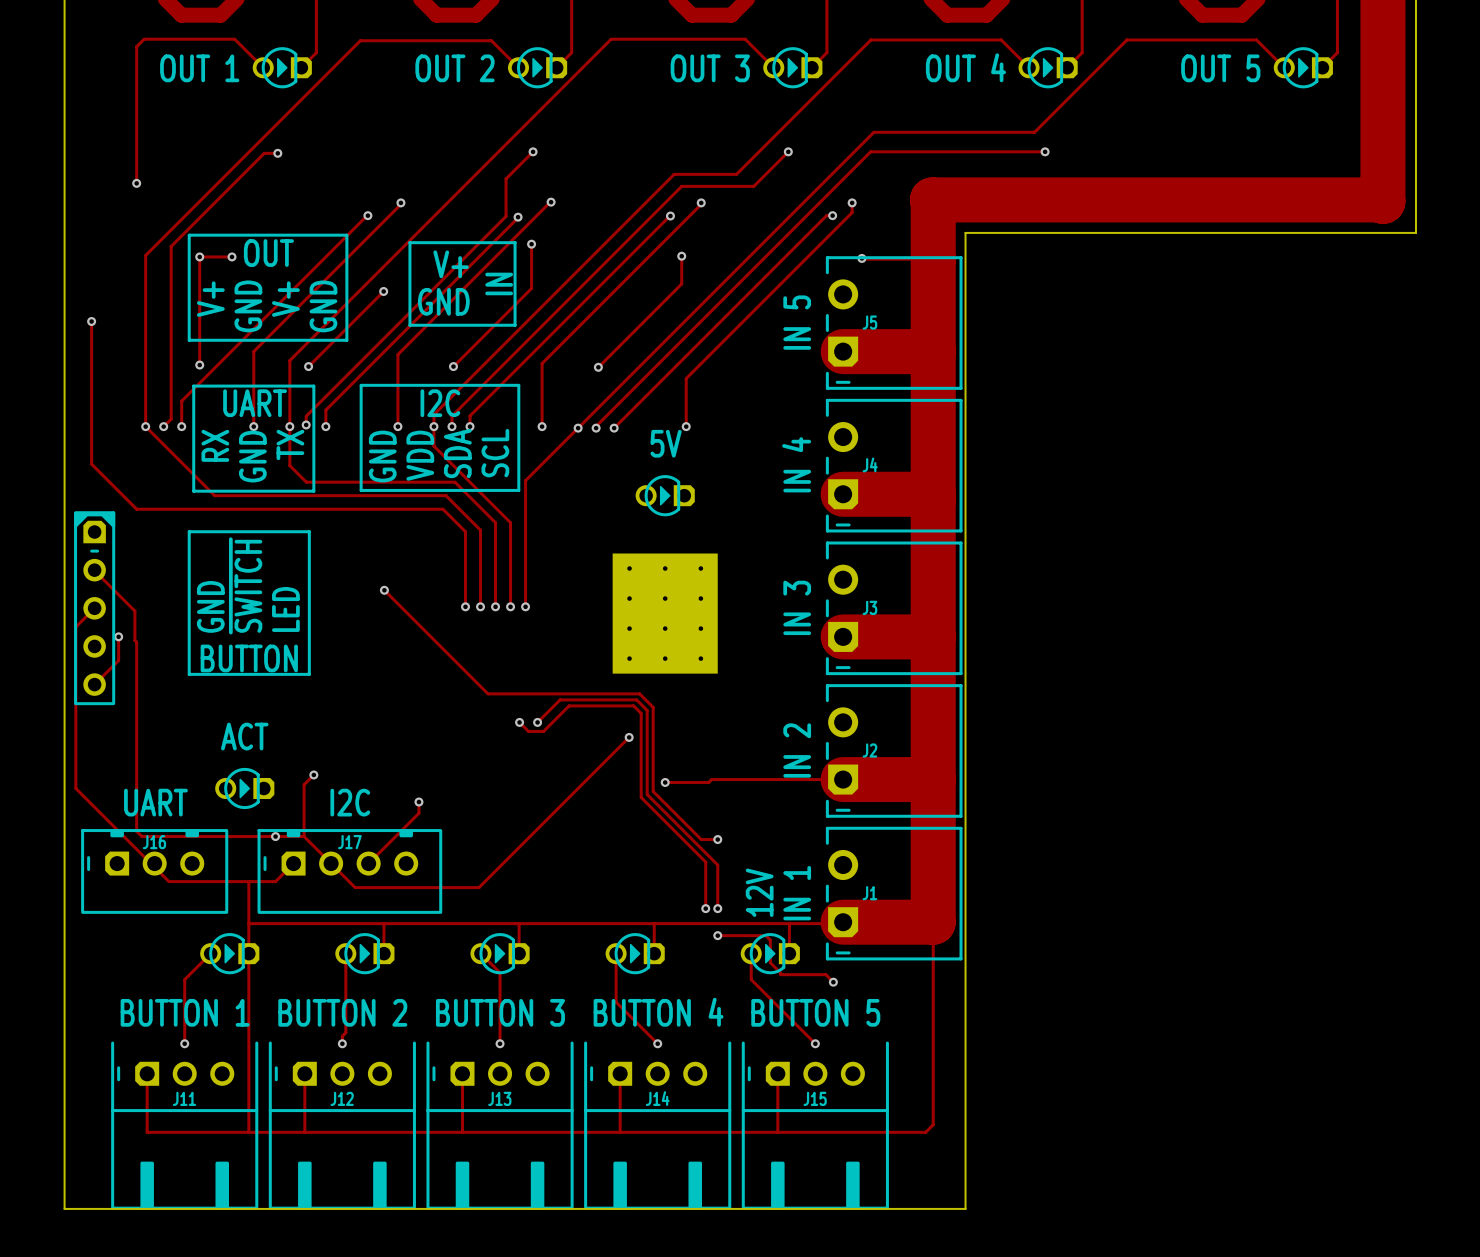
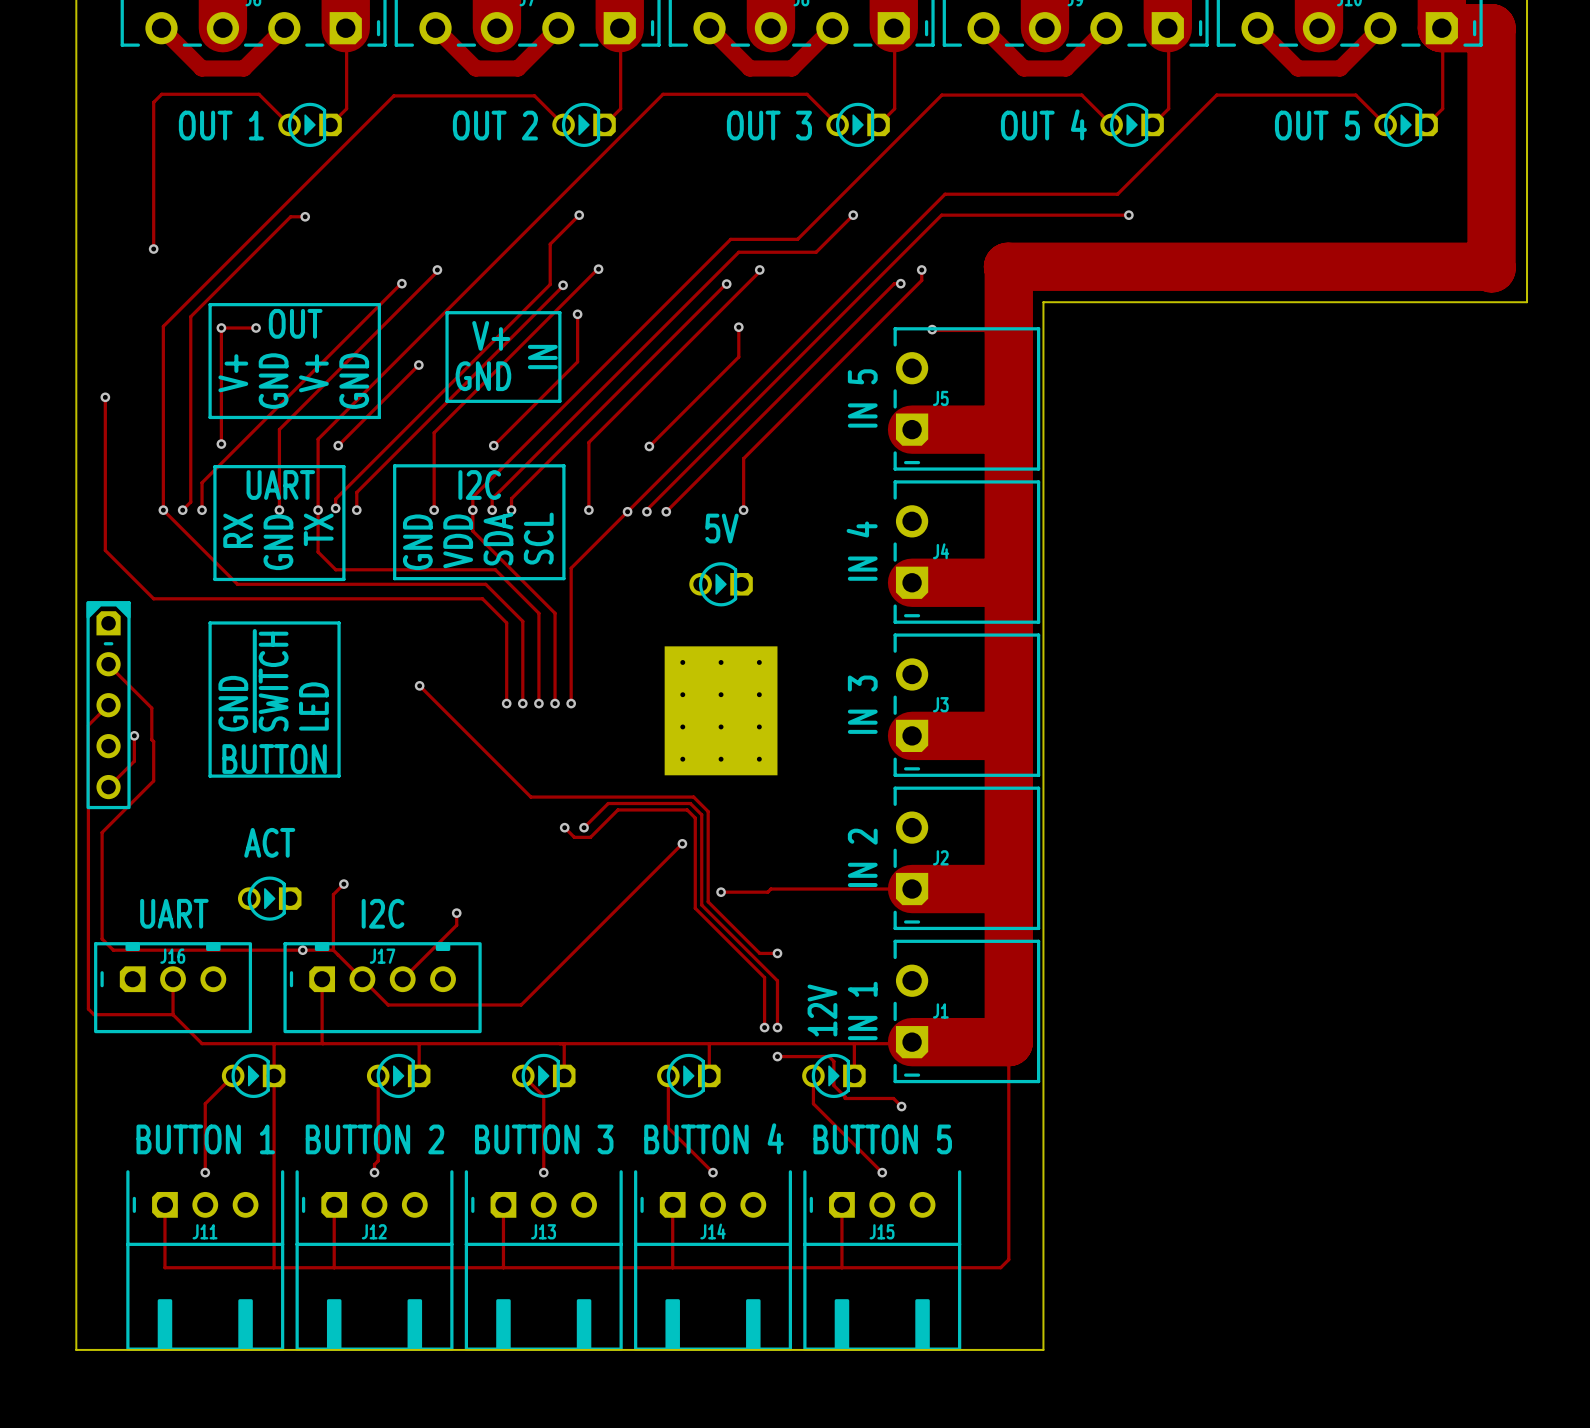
track: (136, 678) (136, 831) (141, 836) -> (153, 780) (102, 832) (102, 938) (113, 950) (159, 950)
track: (75, 788) (168, 881) (275, 881) (293, 863) -> (88, 898) (88, 1009) (94, 1014) (173, 1014)
track: none -> (173, 979) (173, 1014)
track: none -> (322, 979) (322, 1043)
track: (249, 881) (248, 923) -> (173, 1014) (202, 1043) (274, 1043)

